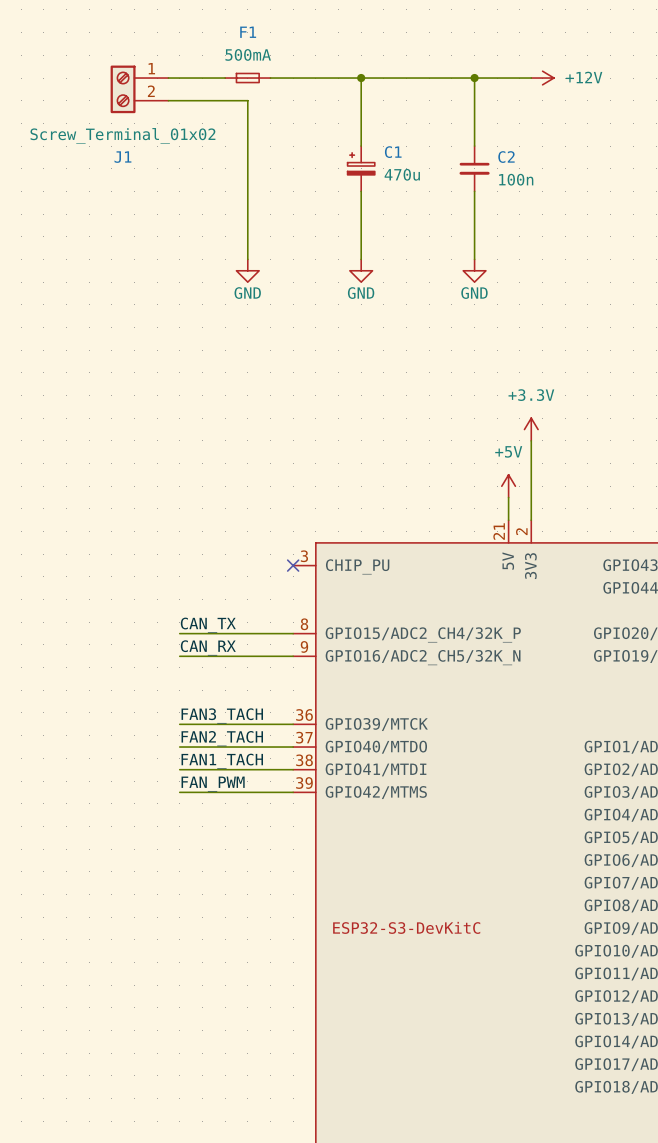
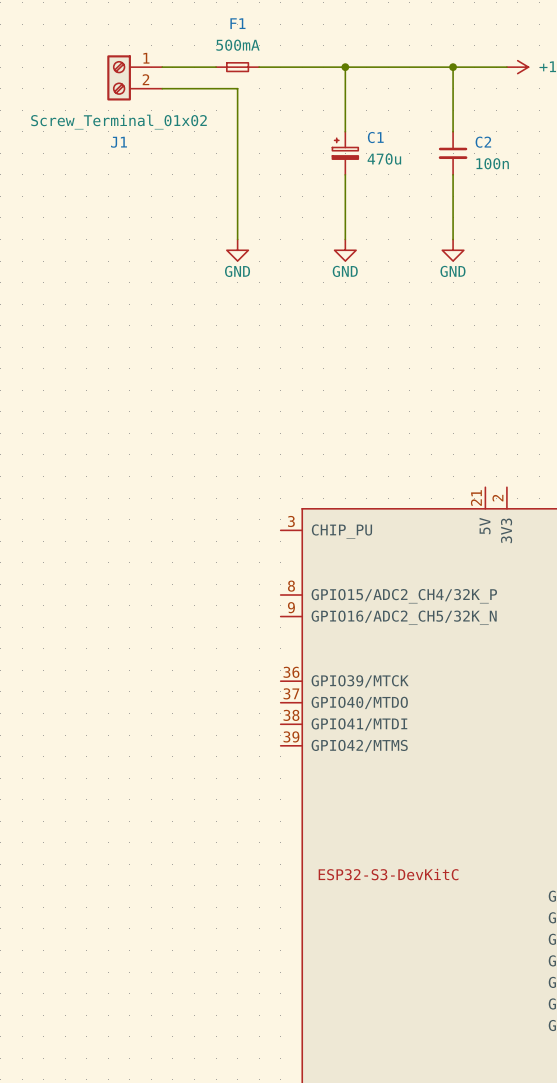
power symbol: +3.3V (531, 429) -> none
wire: (531, 440) (531, 520) -> none
power symbol: +5V (508, 486) -> none
wire: (508, 497) (508, 520) -> none
no-connect mark: (293, 565) -> none
label: CAN_TX (208, 625) -> none
wire: (179, 633) (293, 633) -> none
label: CAN_RX (208, 647) -> none
wire: (179, 656) (293, 656) -> none
label: FAN3_TACH (222, 715) -> none
wire: (179, 724) (293, 724) -> none
label: FAN2_TACH (222, 738) -> none
wire: (179, 747) (293, 747) -> none
label: FAN1_TACH (222, 761) -> none
wire: (179, 769) (293, 769) -> none
label: FAN_PWM (213, 784) -> none
wire: (179, 792) (293, 792) -> none

